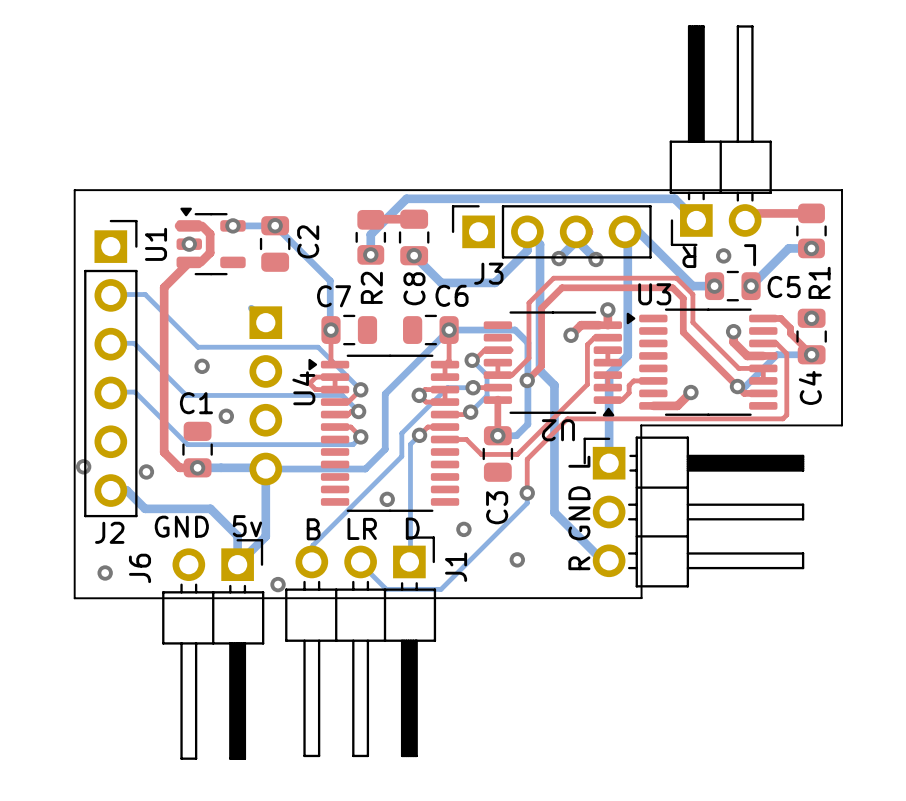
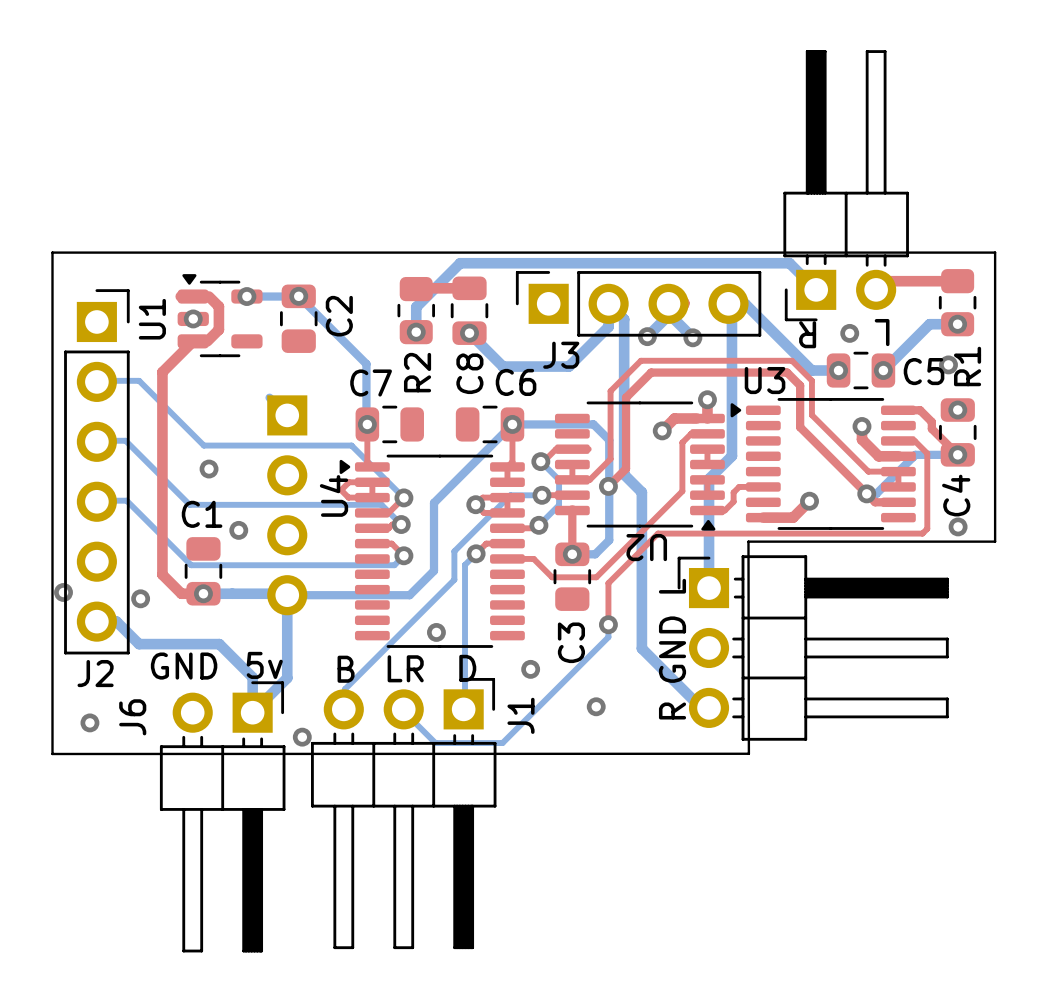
via: none -> (948, 364)
via: none -> (958, 526)

